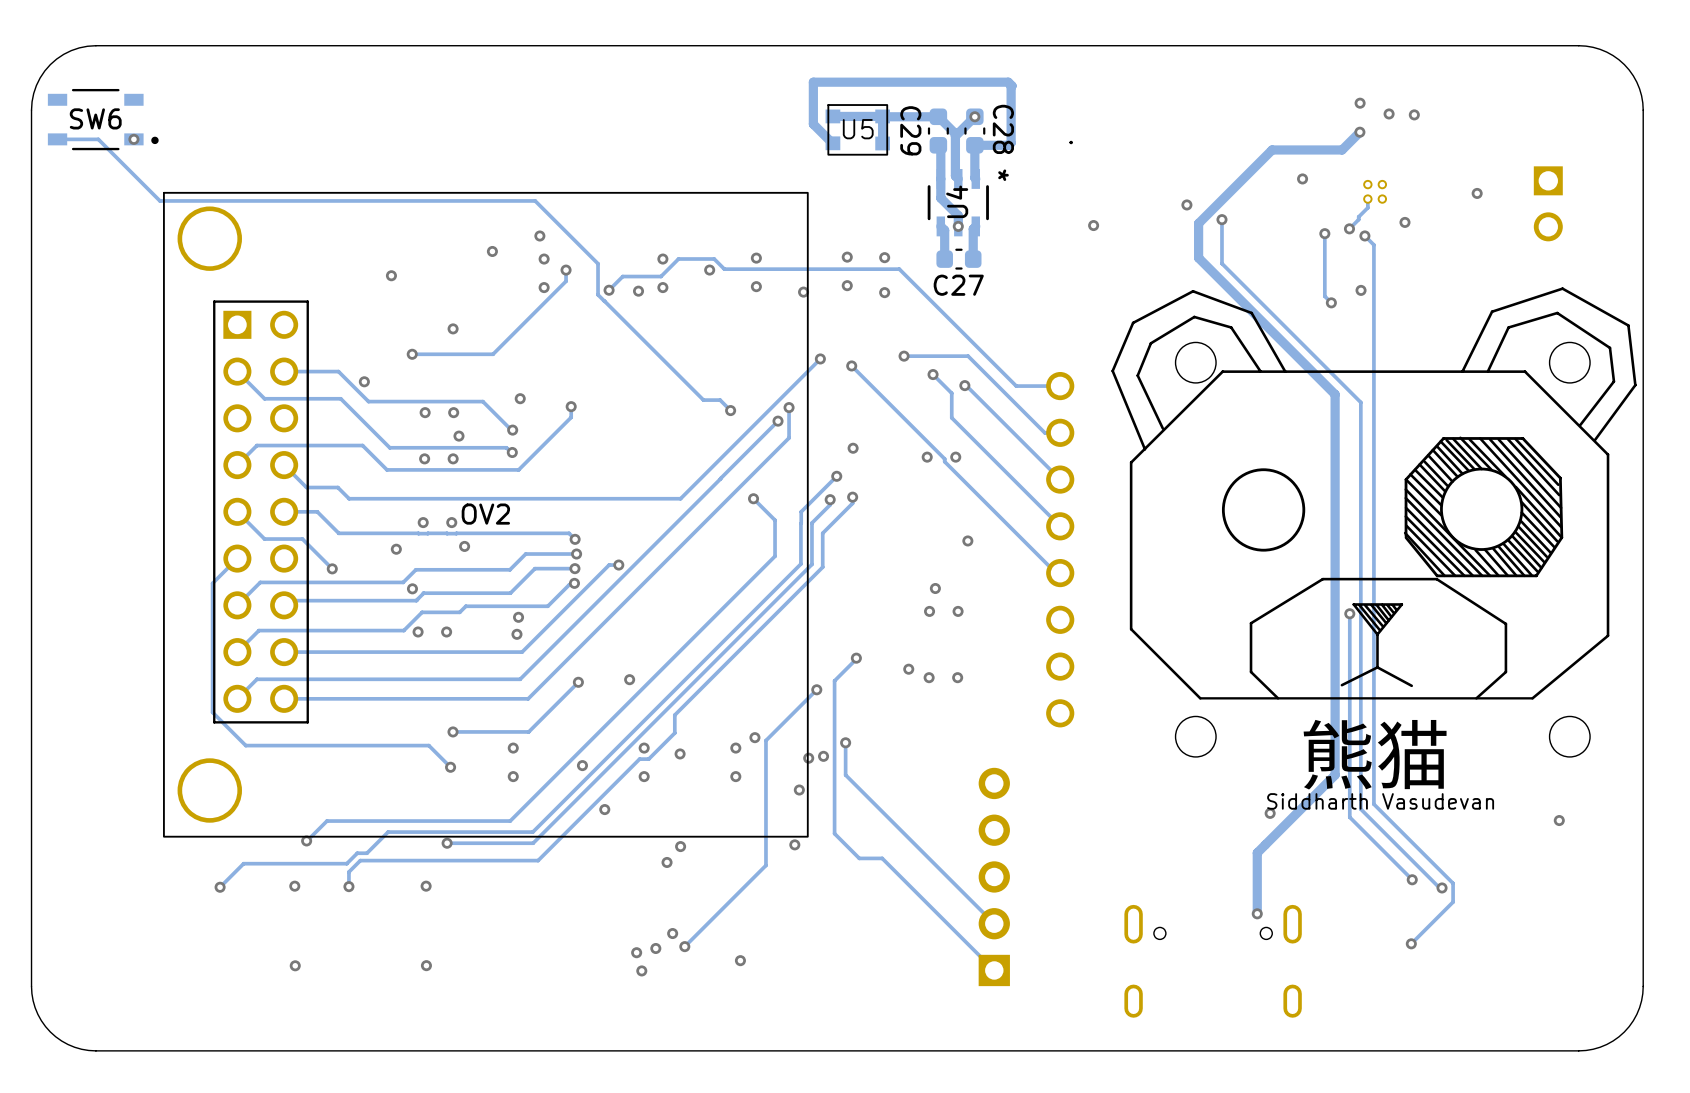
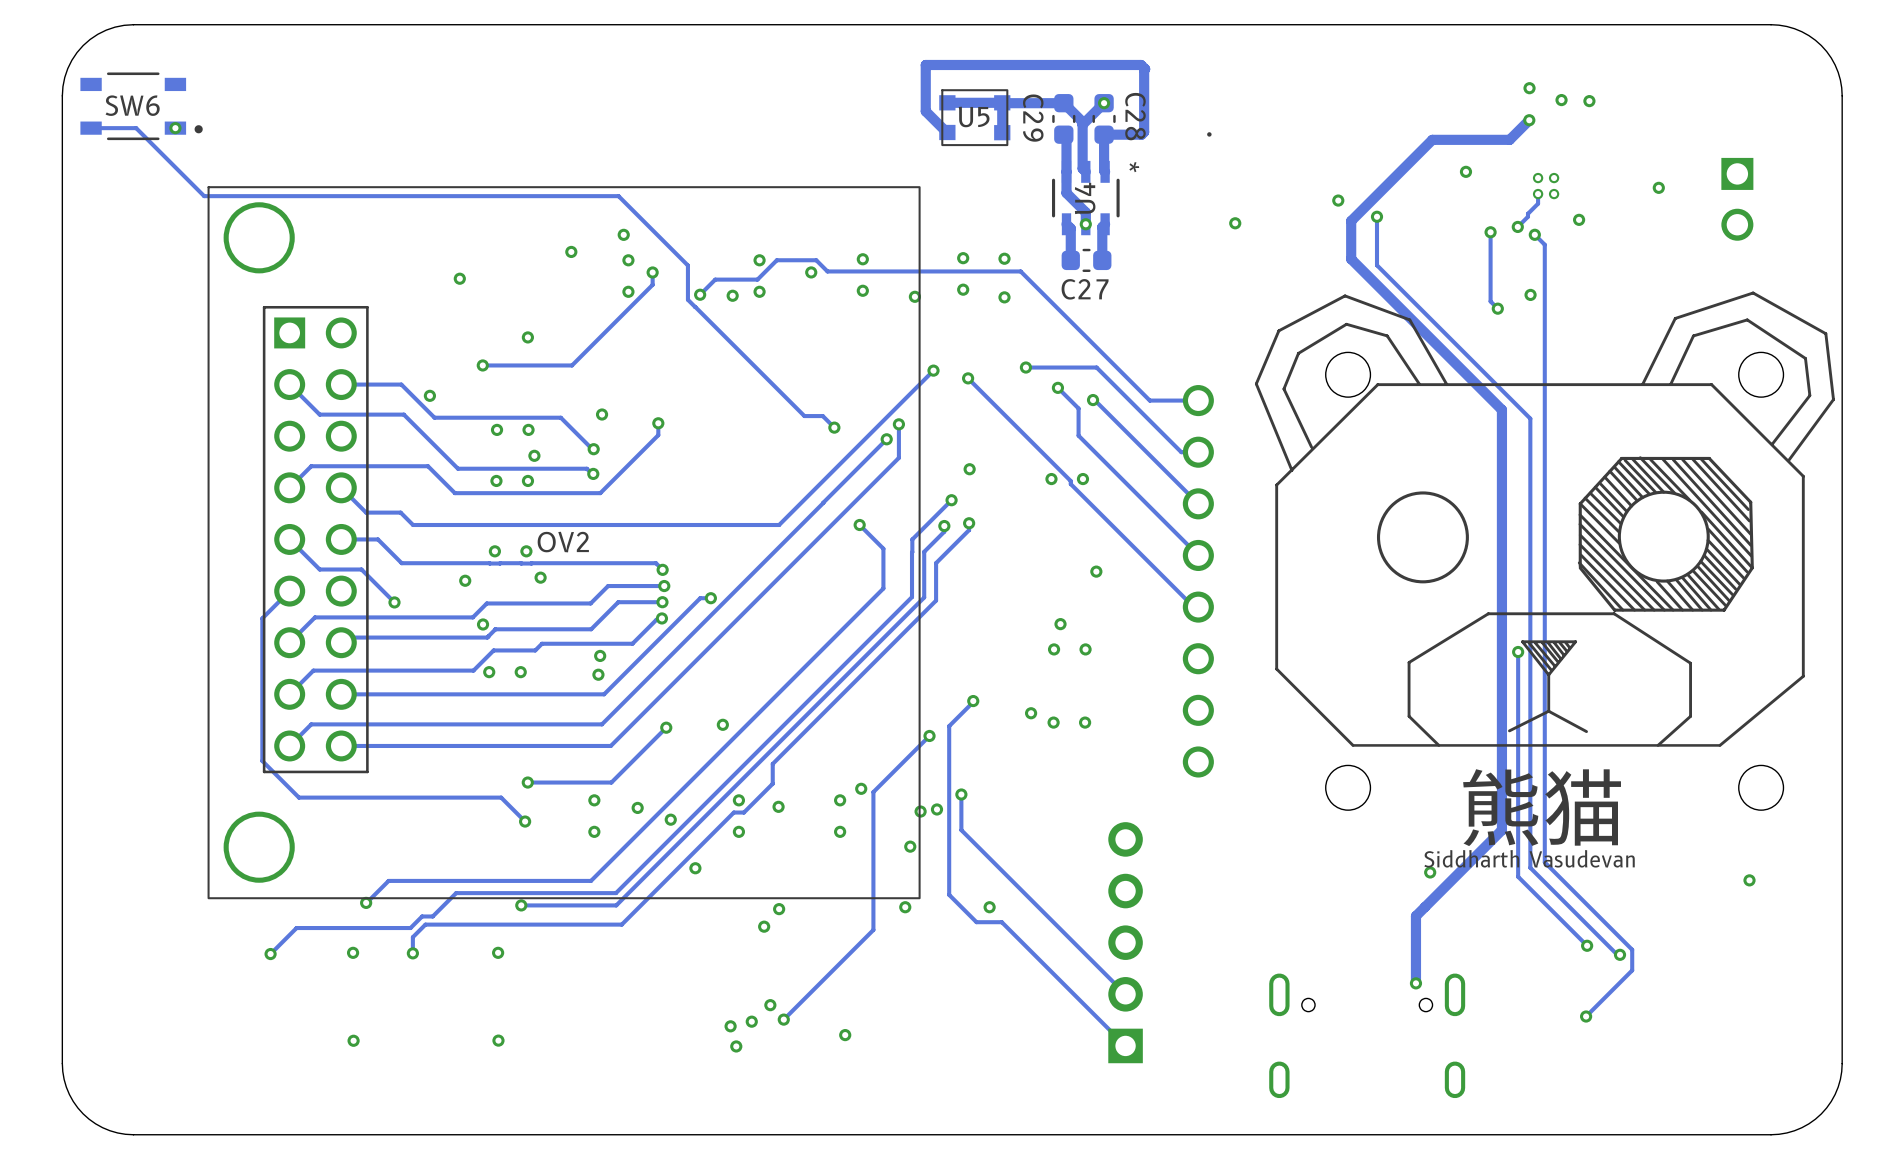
via: none -> (637, 807)
via: none -> (989, 907)

